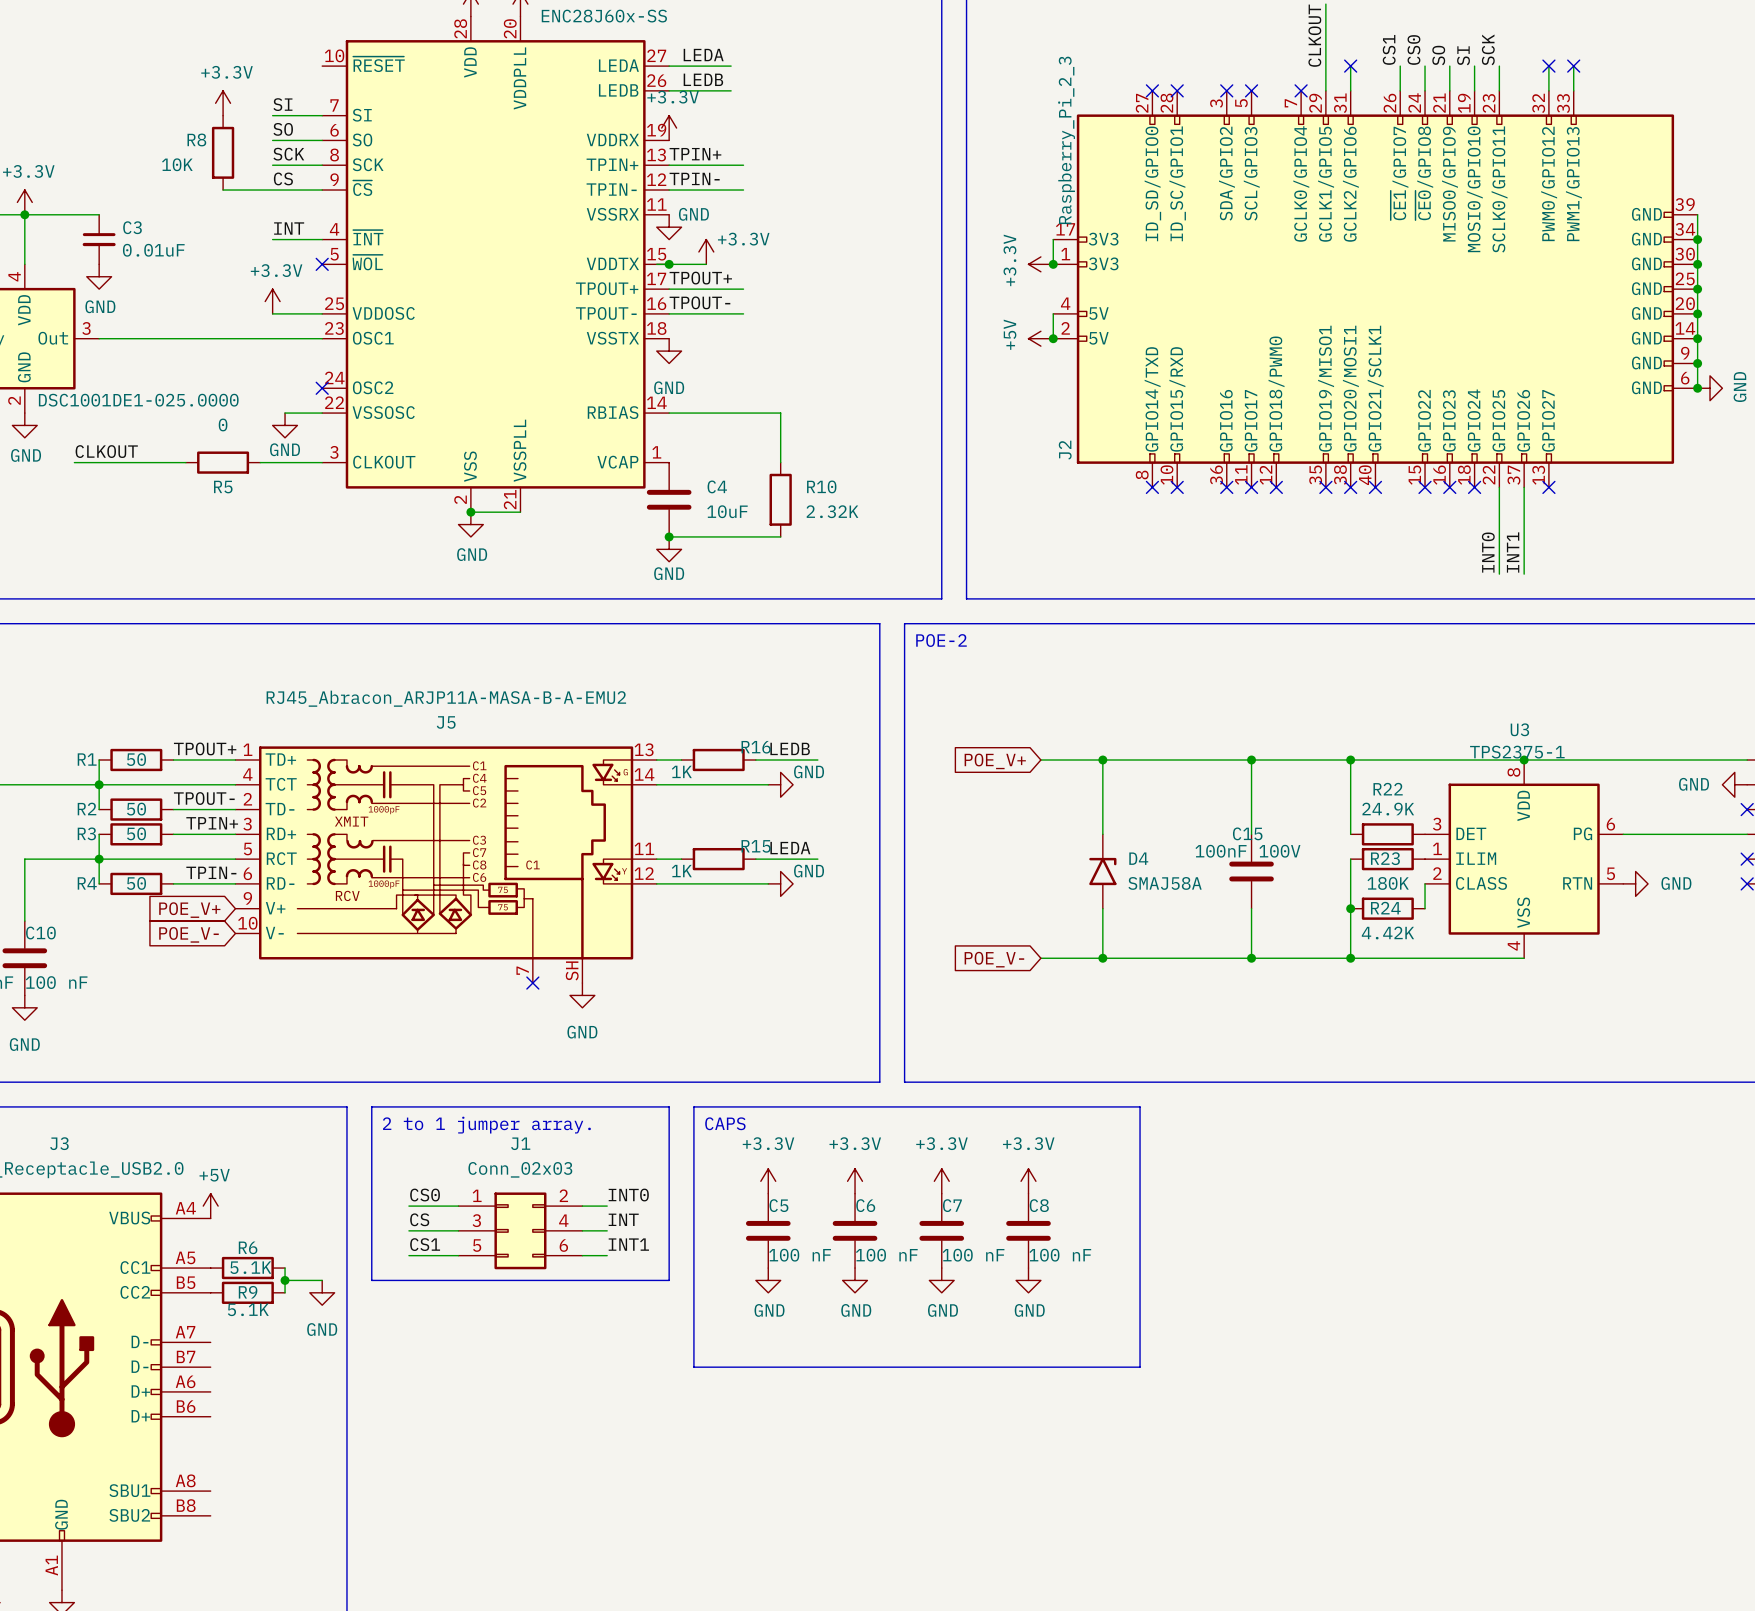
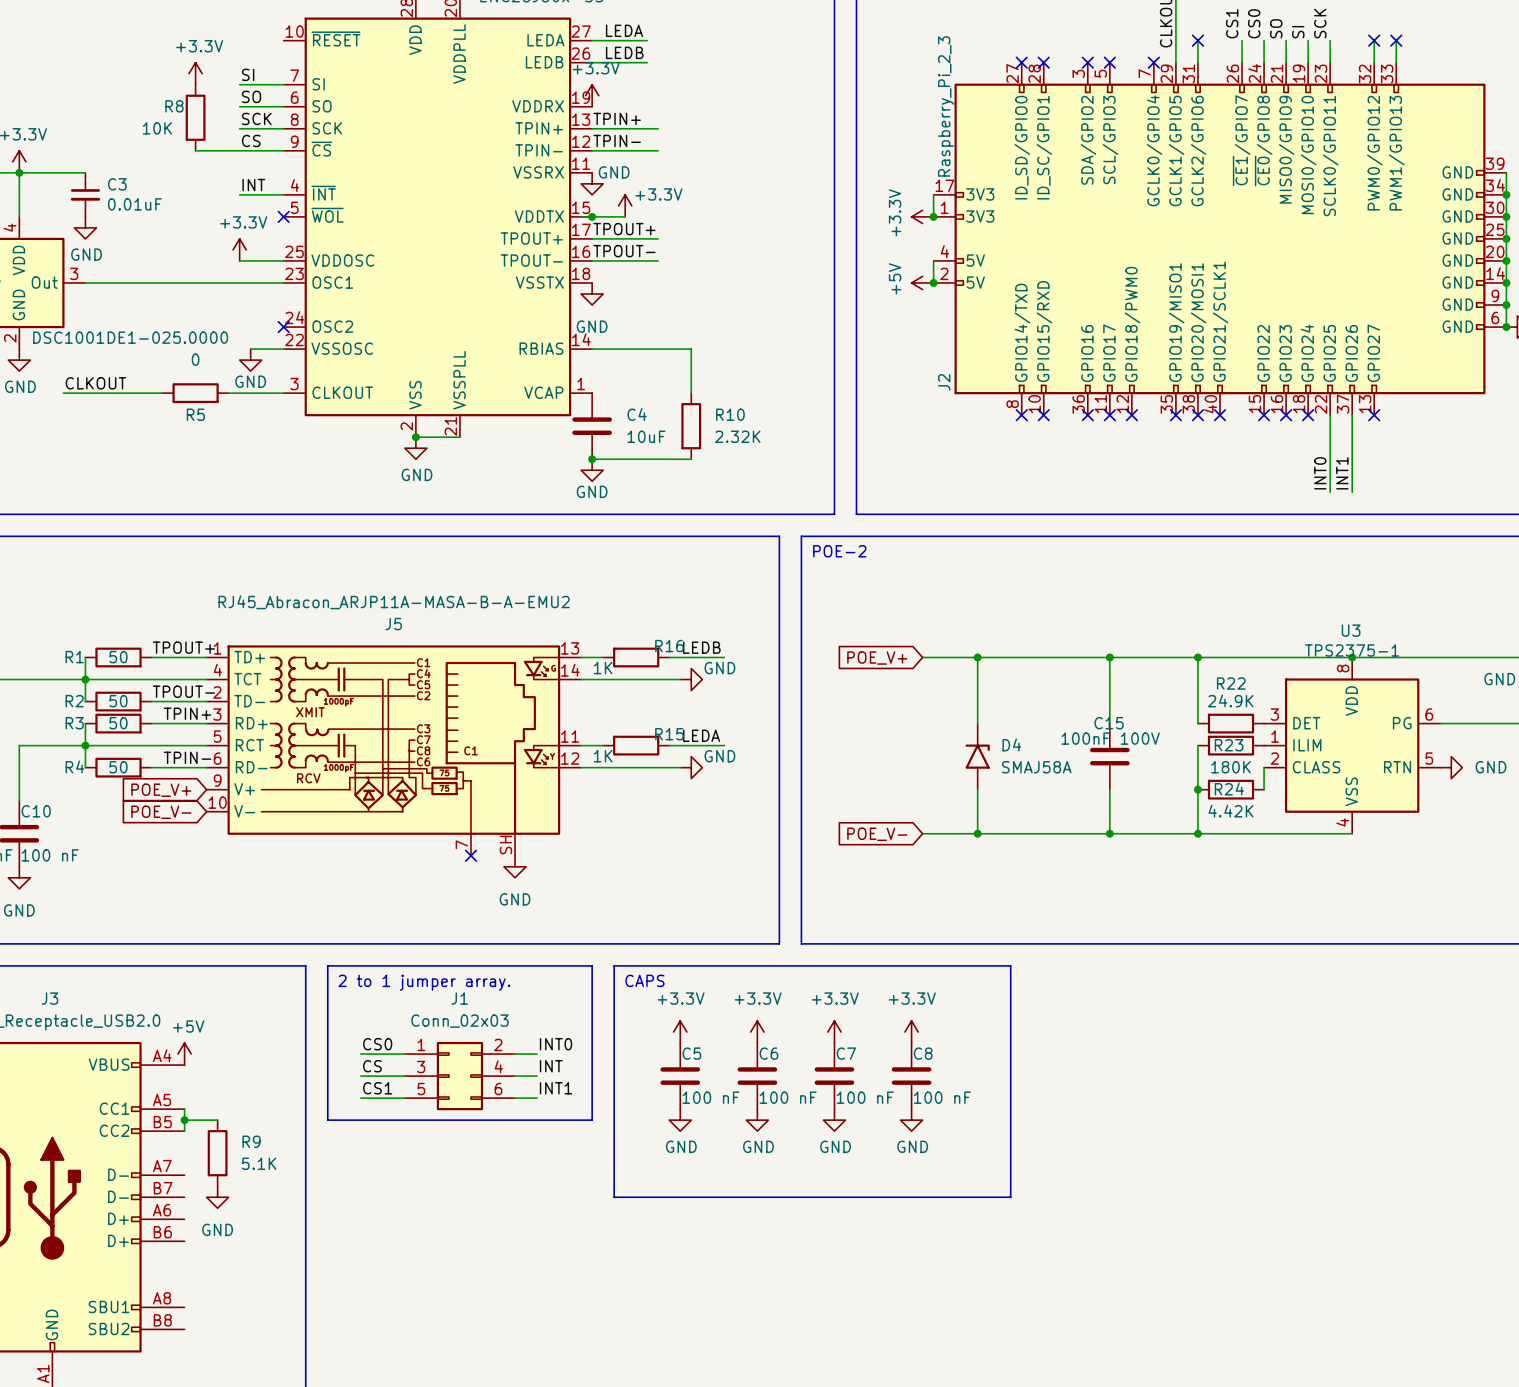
R6: 5.1K (247, 1268) -> none
wire: (285, 1268) (285, 1292) -> (184, 1109) (184, 1131)
junction: none -> (184, 1120)
wire: (285, 1280) (322, 1280) -> (184, 1120) (217, 1120)
junction: (285, 1280) -> none
R9 rotation: 0° (247, 1292) -> 90° clockwise (217, 1153)
R9 name position: R9 (248, 1292) -> R9 (251, 1141)
power symbol position: GND (322, 1292) -> GND (217, 1197)
R9 value position: 5.1K (248, 1309) -> 5.1K (259, 1163)

